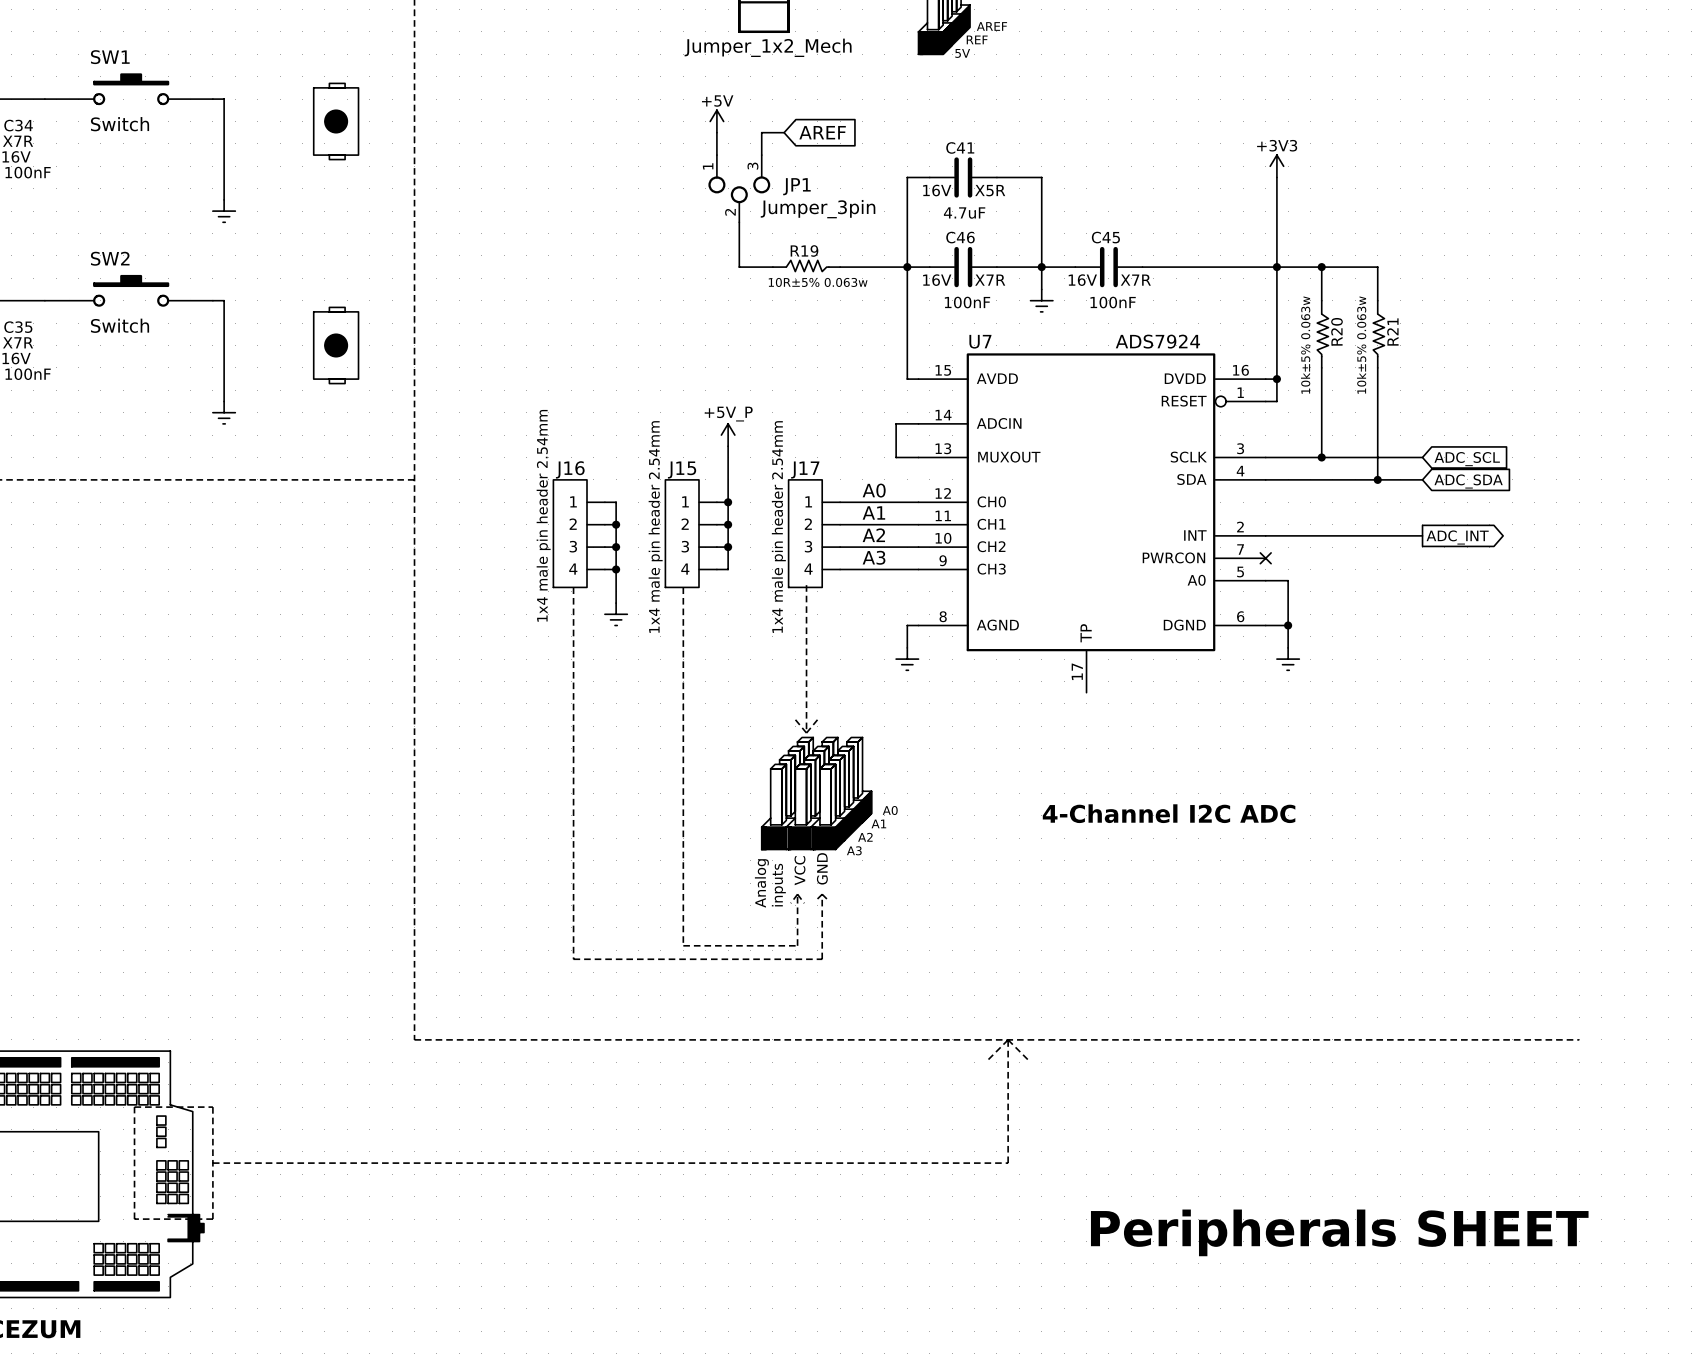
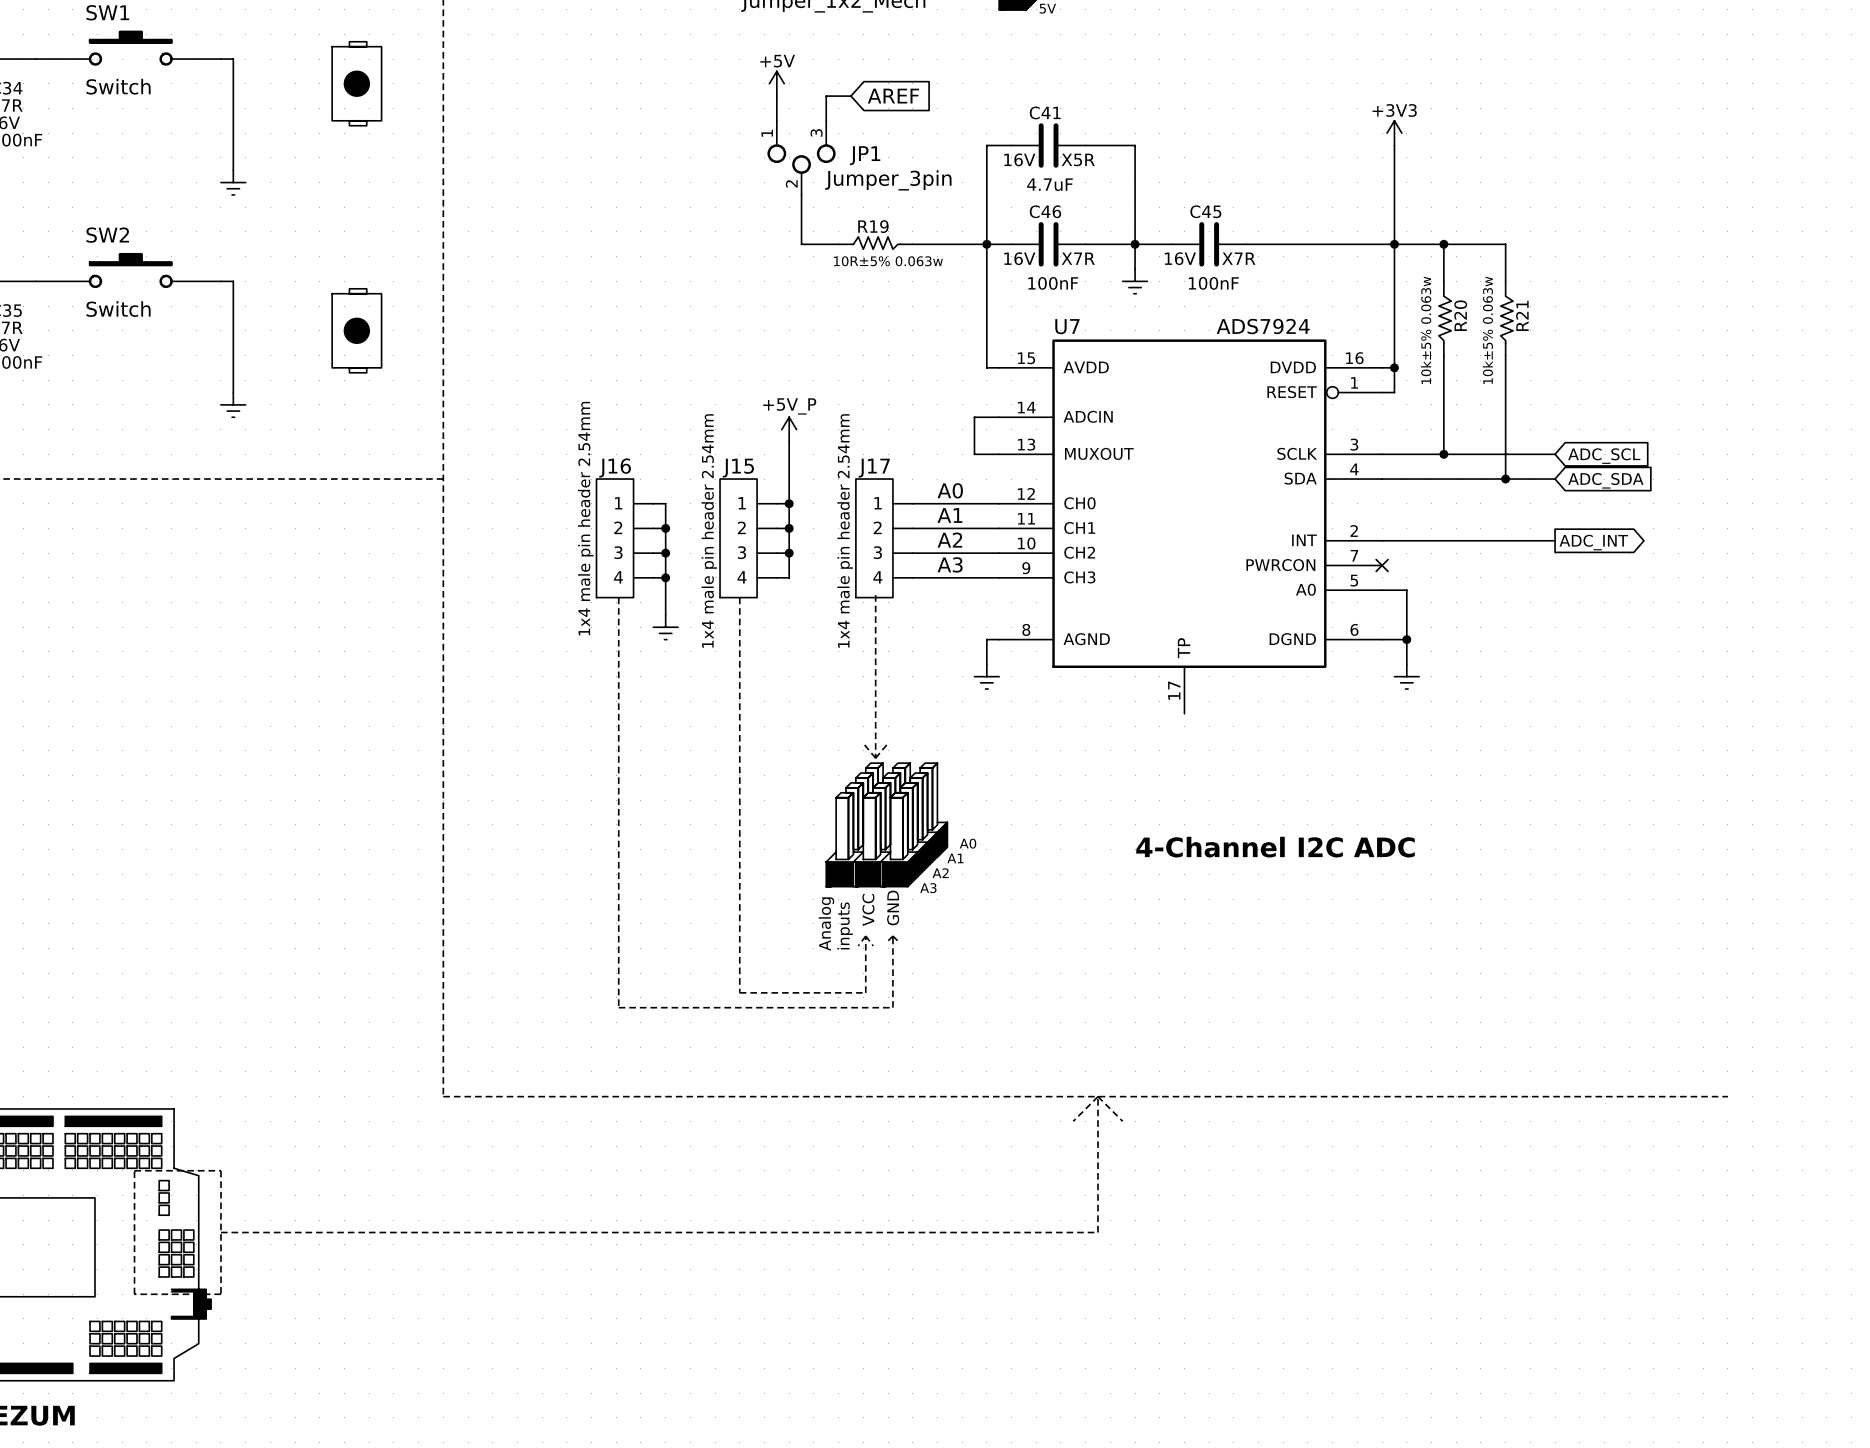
text: Peripherals SHEET (1339, 1232) -> none

